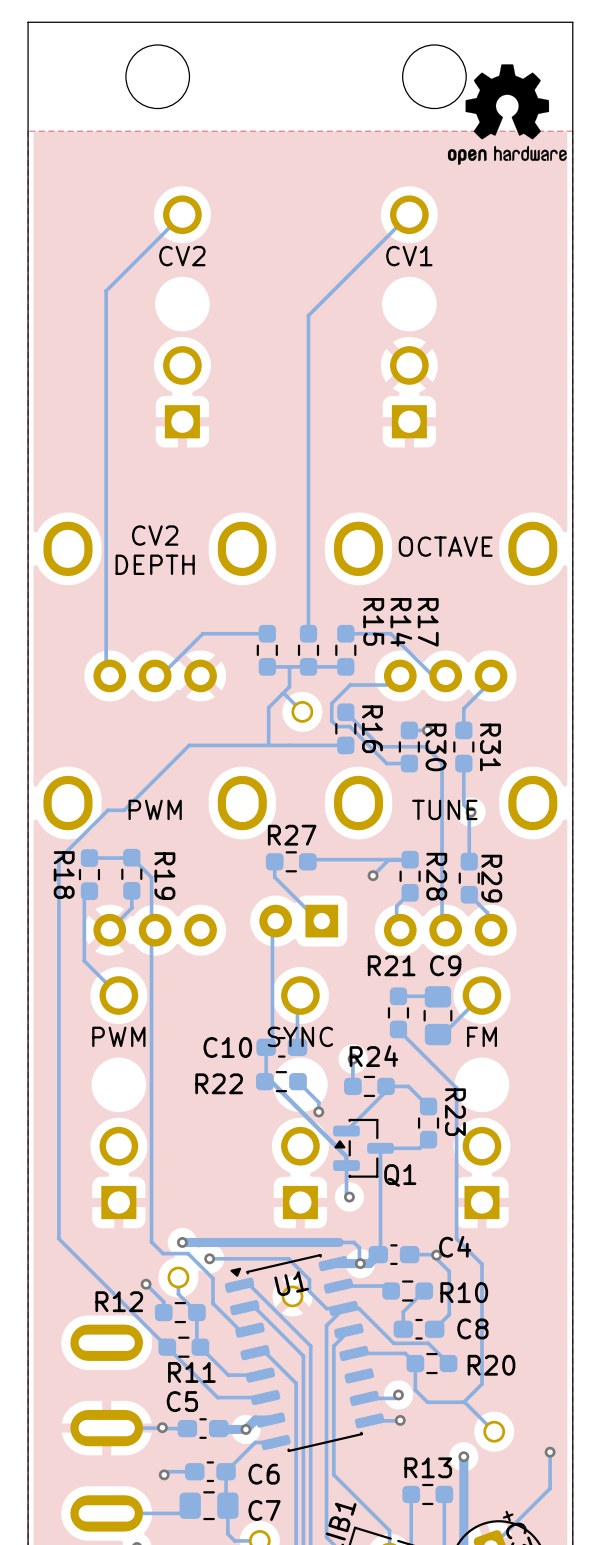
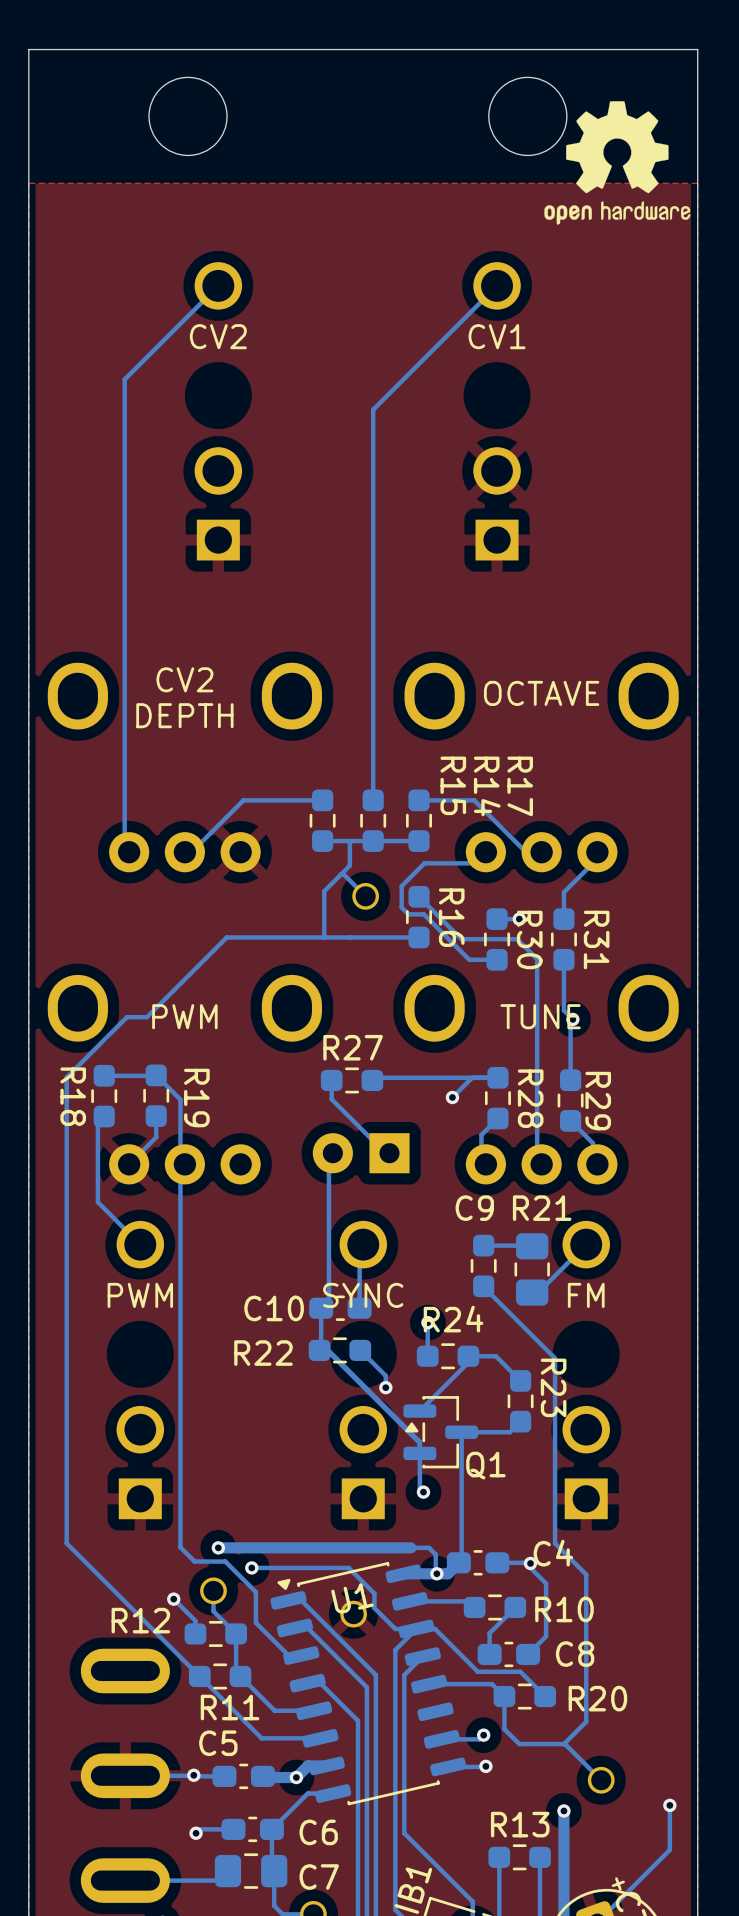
R21 name position: R21 (391, 965) -> R21 (542, 1208)
C9 name position: C9 (445, 965) -> C9 (474, 1208)

